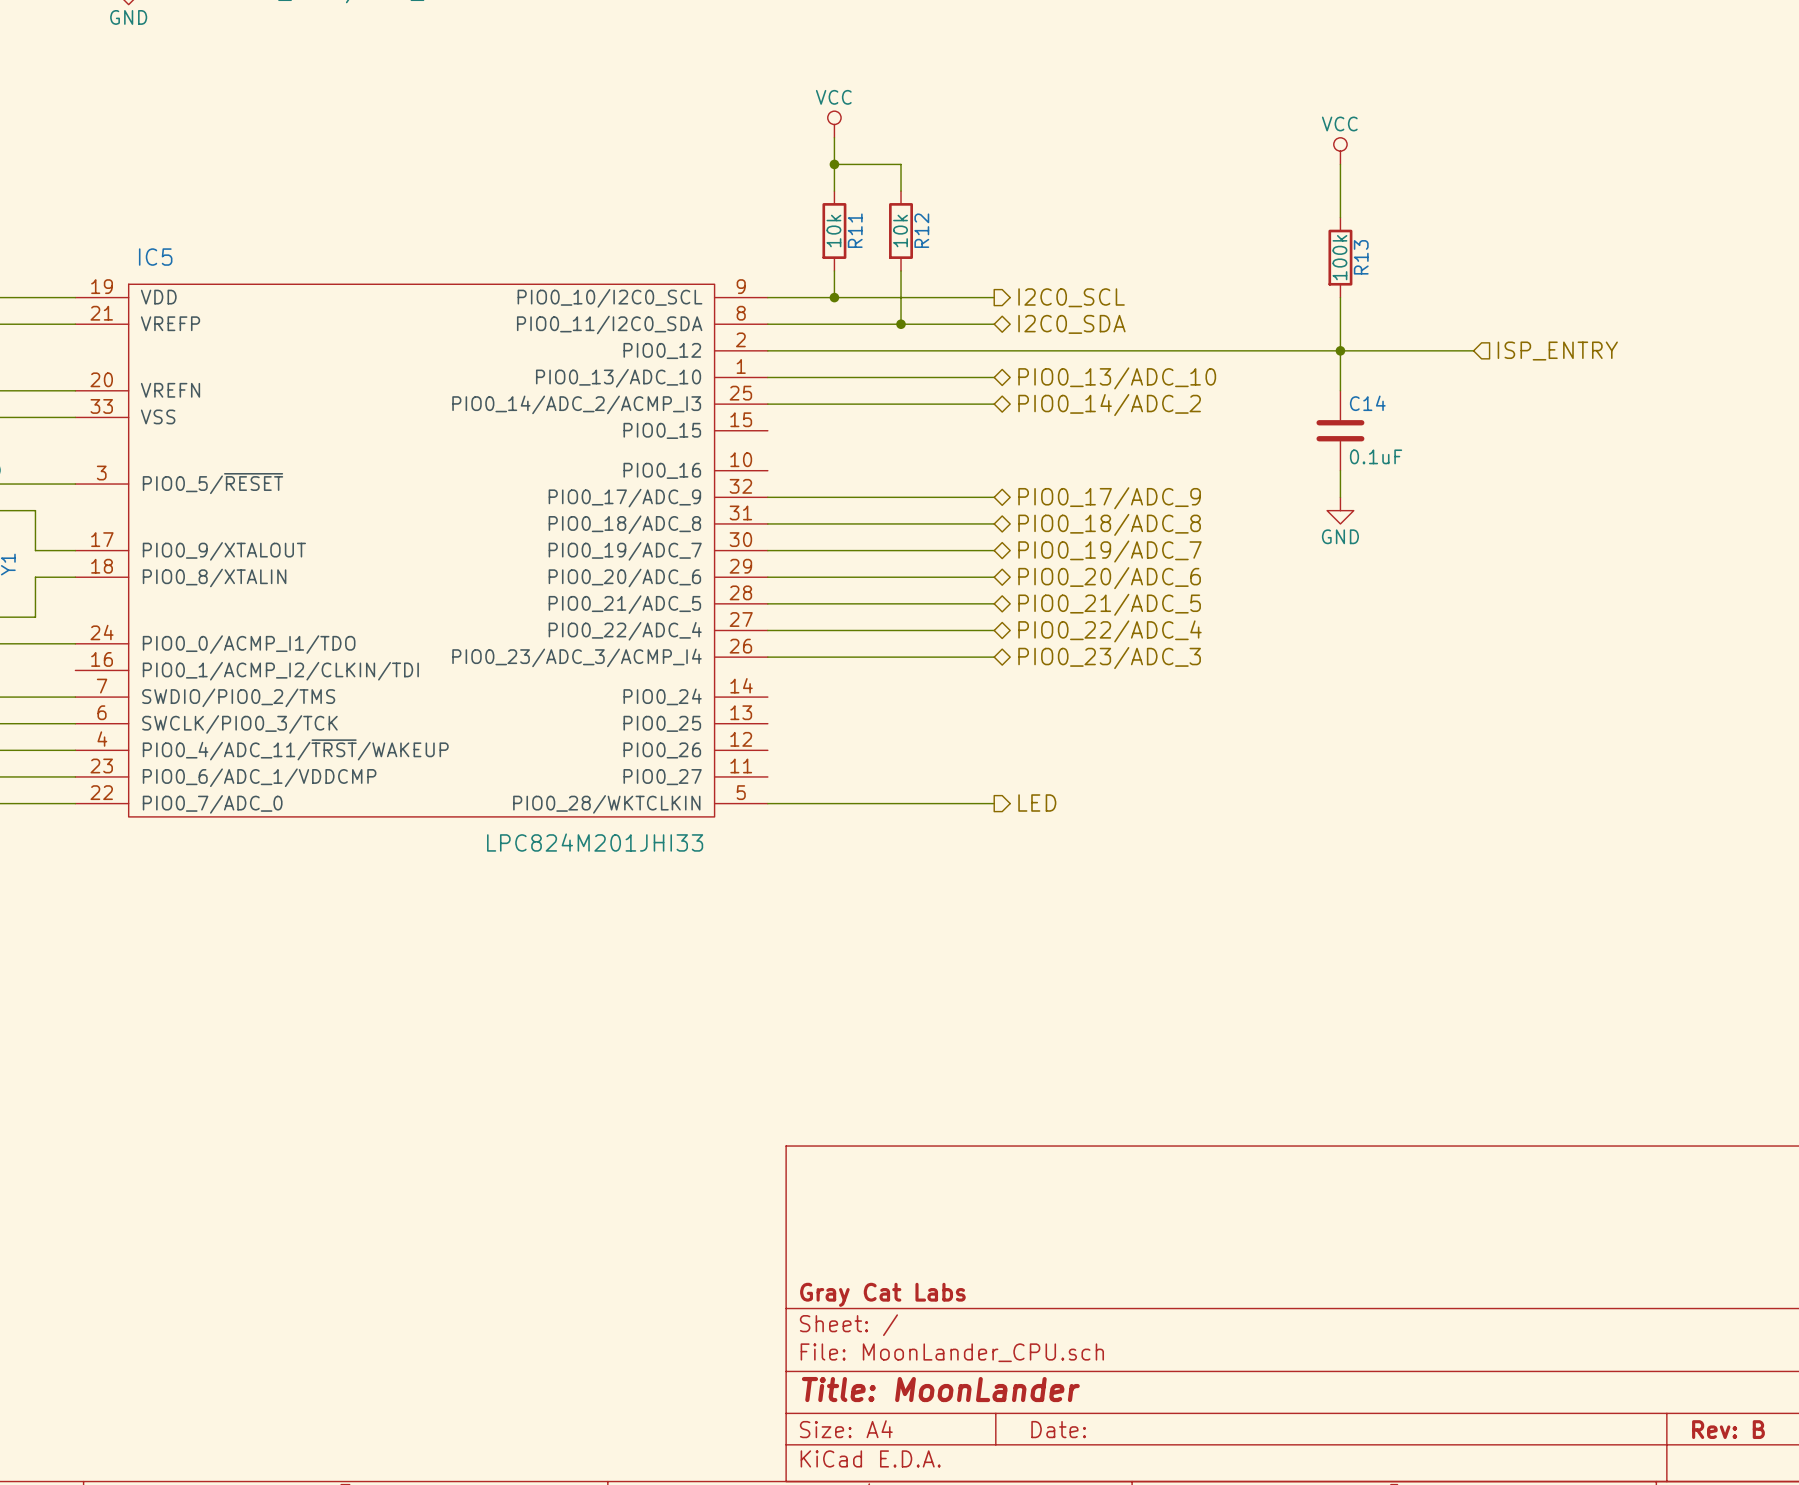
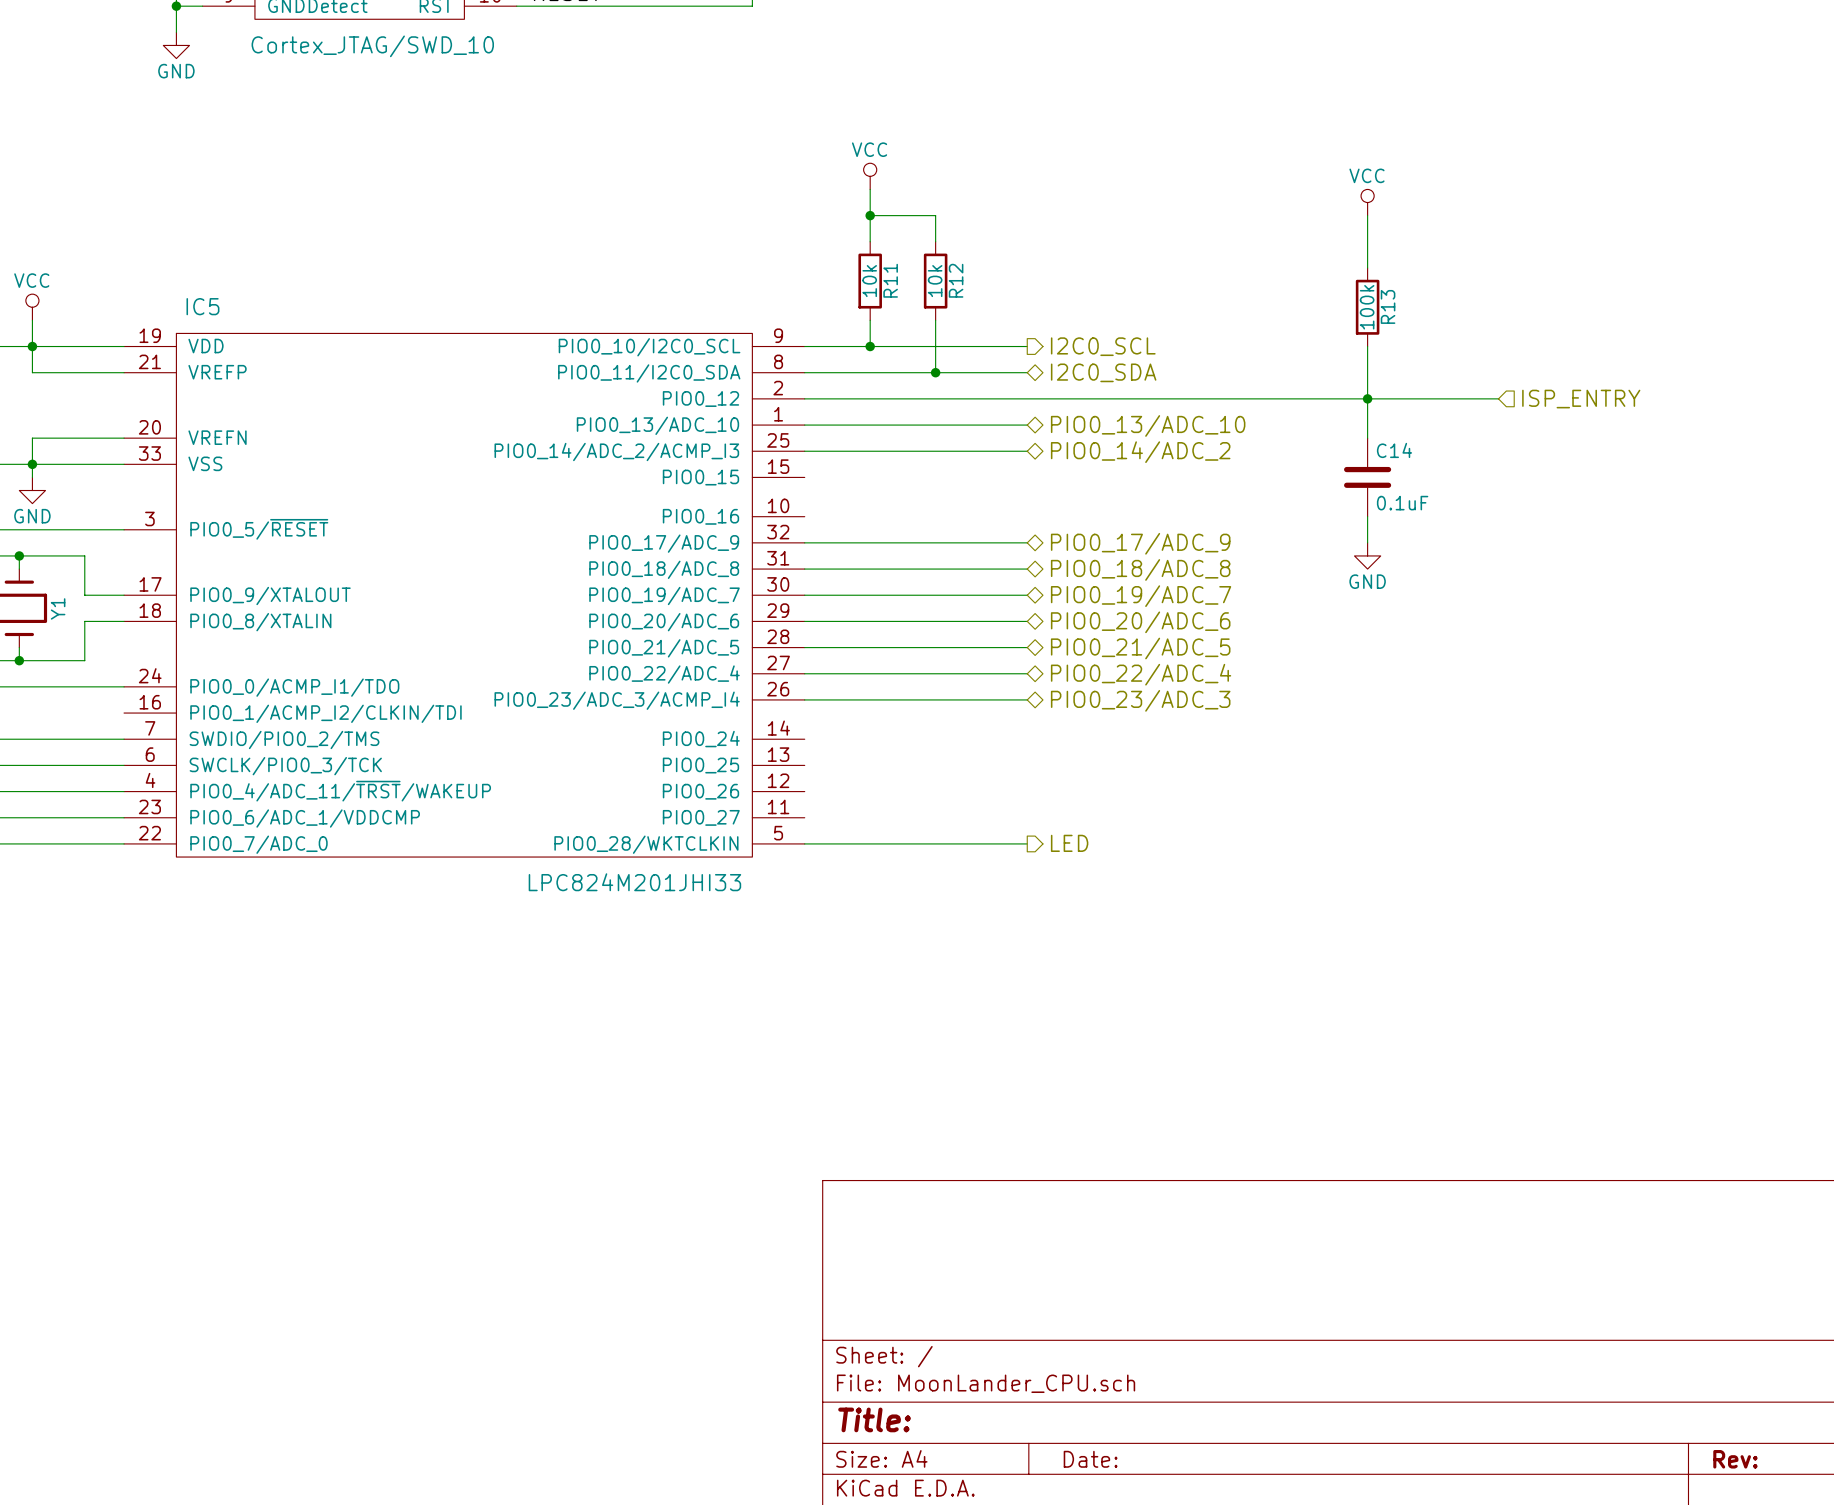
title block: Gray Cat Labs (882, 1294) -> none
title block: Title: MoonLander (940, 1389) -> Title: (874, 1419)
title block: Rev: B (1728, 1429) -> Rev: (1735, 1459)

